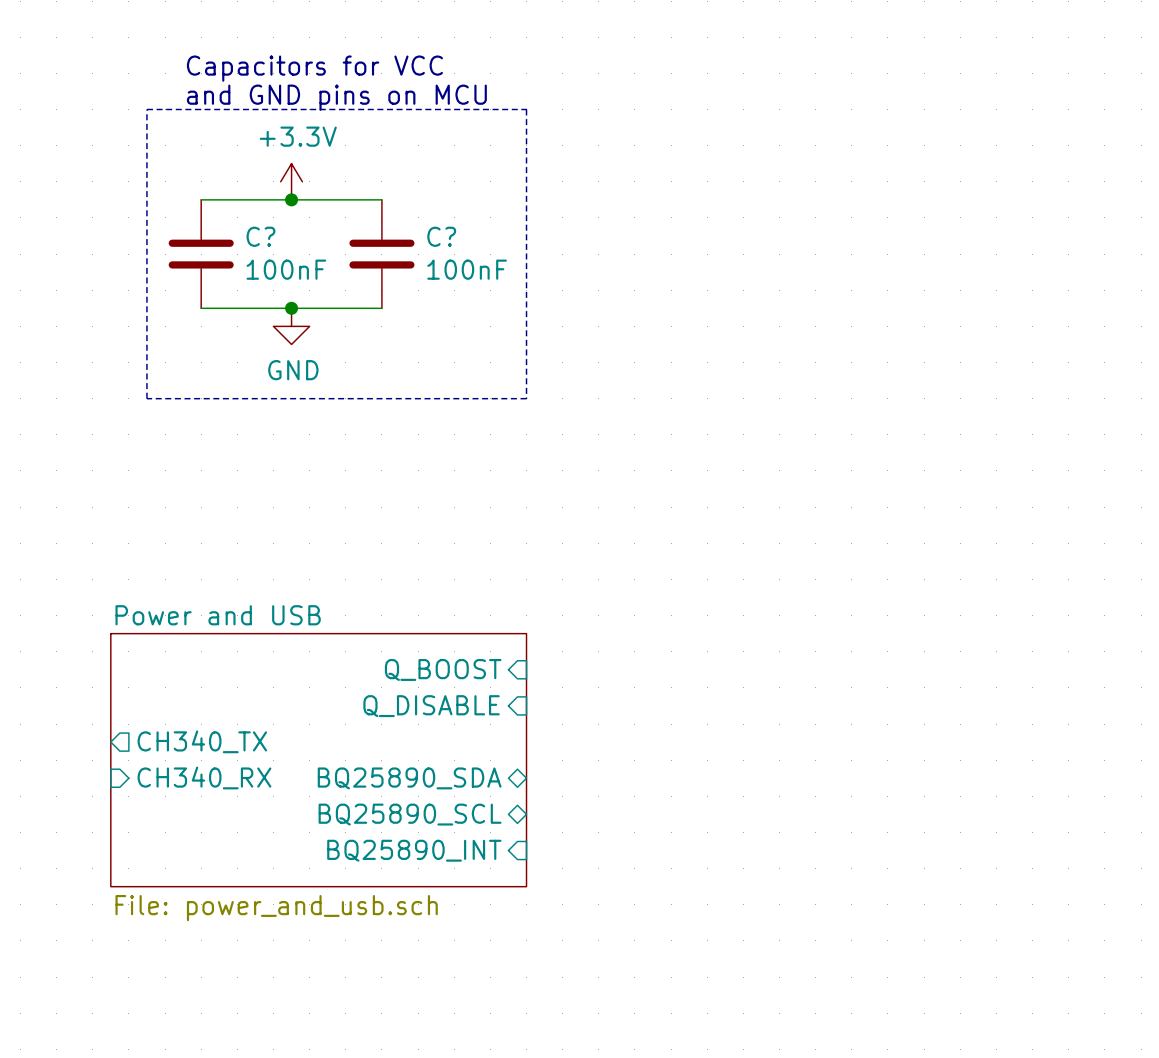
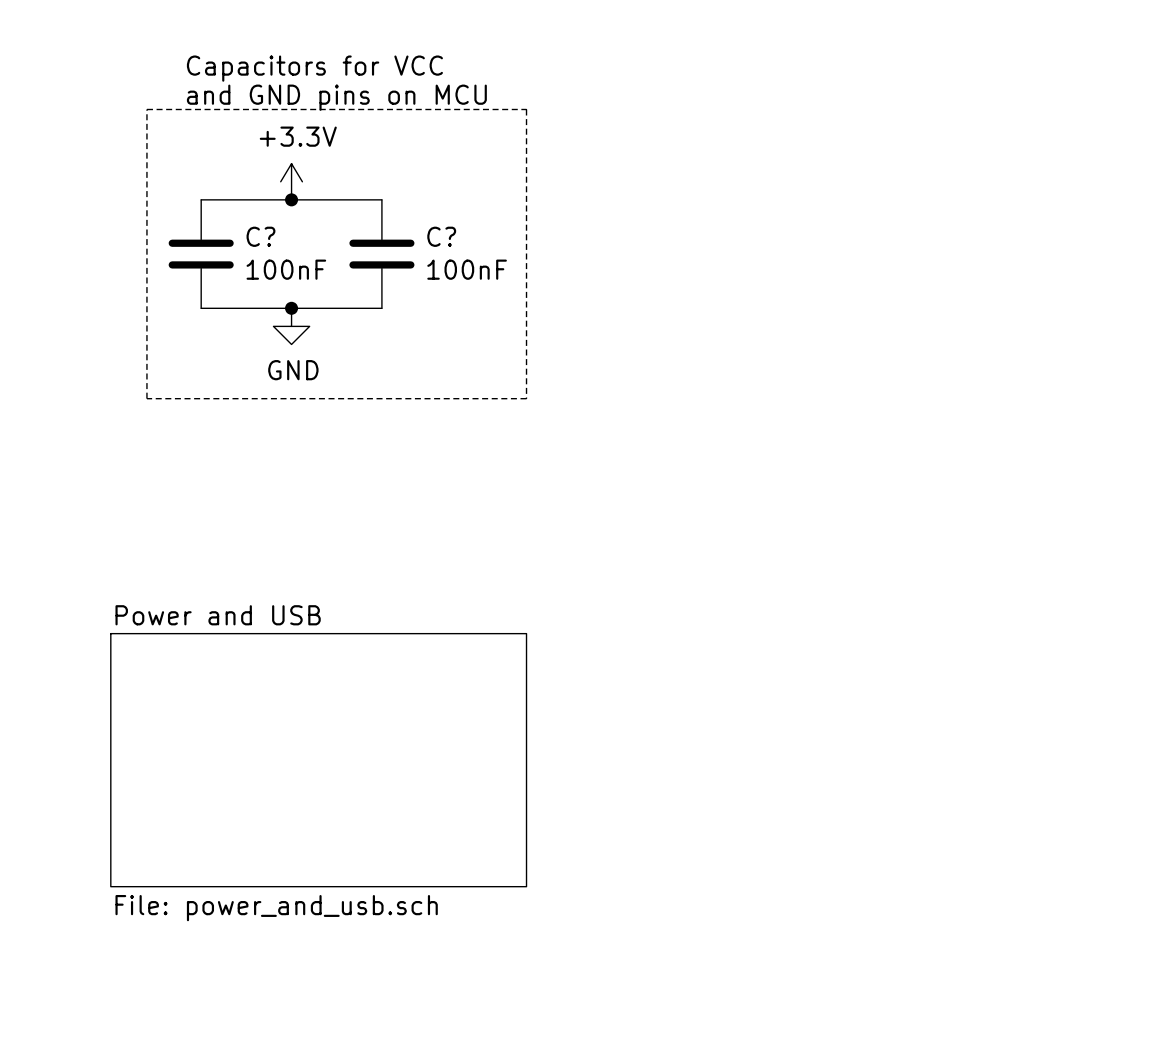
sheet pin: Q_BOOST (443, 669) -> none
sheet pin: Q_DISABLE (431, 706) -> none
sheet pin: CH340_TX (202, 741) -> none
sheet pin: CH340_RX (204, 777) -> none
sheet pin: BQ25890_SDA (409, 778) -> none
sheet pin: BQ25890_SCL (410, 814) -> none
sheet pin: BQ25890_INT (414, 850) -> none

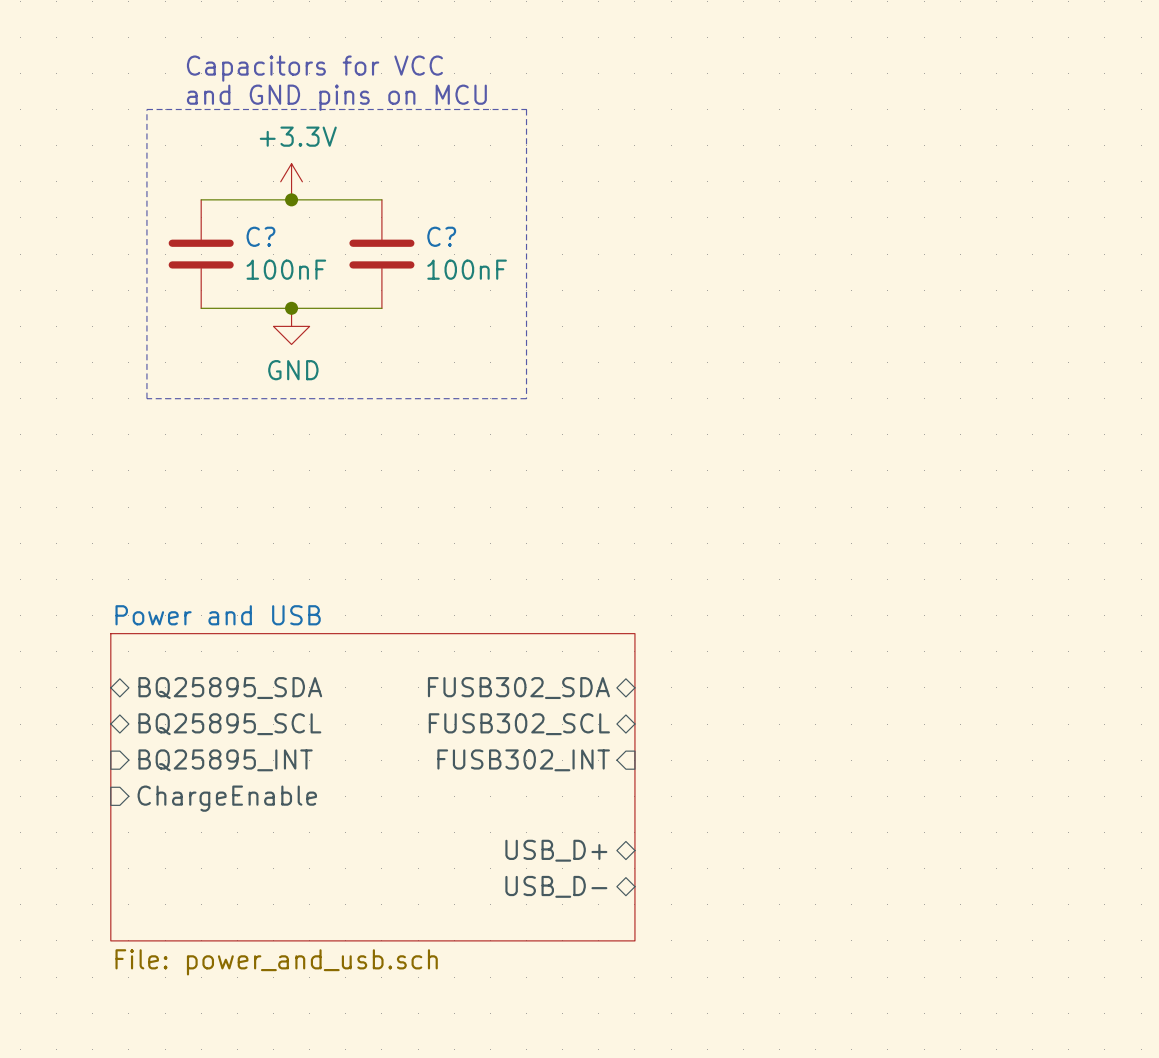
sheet pin: none -> BQ25895_SDA (230, 688)
sheet pin: none -> FUSB302_SDA (518, 688)
sheet pin: none -> BQ25895_SCL (229, 724)
sheet pin: none -> FUSB302_SCL (519, 724)
sheet pin: none -> BQ25895_INT (225, 760)
sheet Power and USB: File: power_and_usb.sch (318, 760) -> none
sheet pin: none -> FUSB302_INT (523, 760)
sheet Power and USB: none -> File: power_and_usb.sch (372, 787)
sheet pin: none -> ChargeEnable (227, 798)
sheet pin: none -> USB_D+ (556, 850)
sheet pin: none -> USB_D- (556, 886)

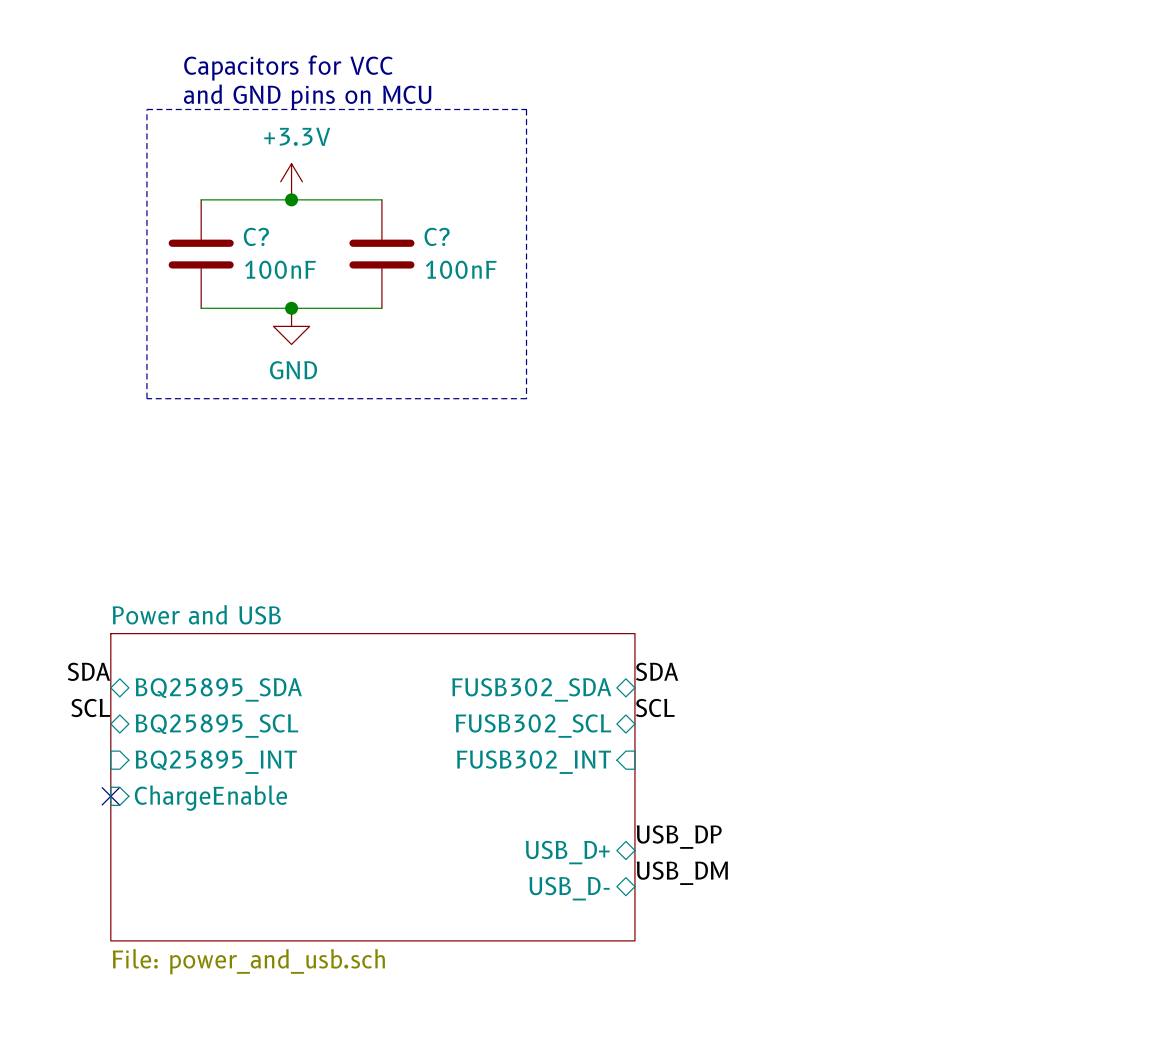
label: none -> SDA (88, 671)
label: none -> SDA (657, 671)
label: none -> SCL (90, 707)
label: none -> SCL (655, 707)
no-connect mark: none -> (110, 796)
label: none -> USB_DP (679, 837)
label: none -> USB_DM (682, 873)

